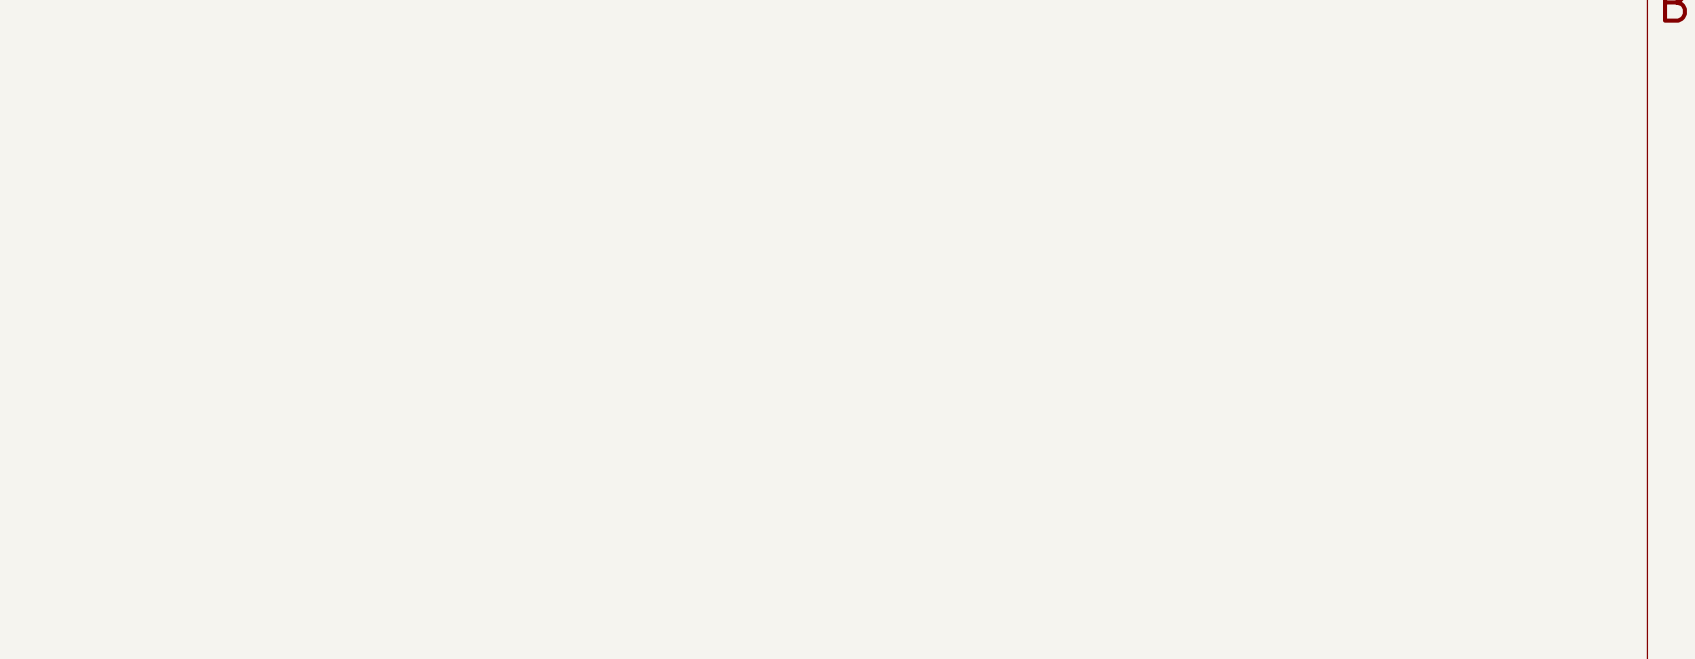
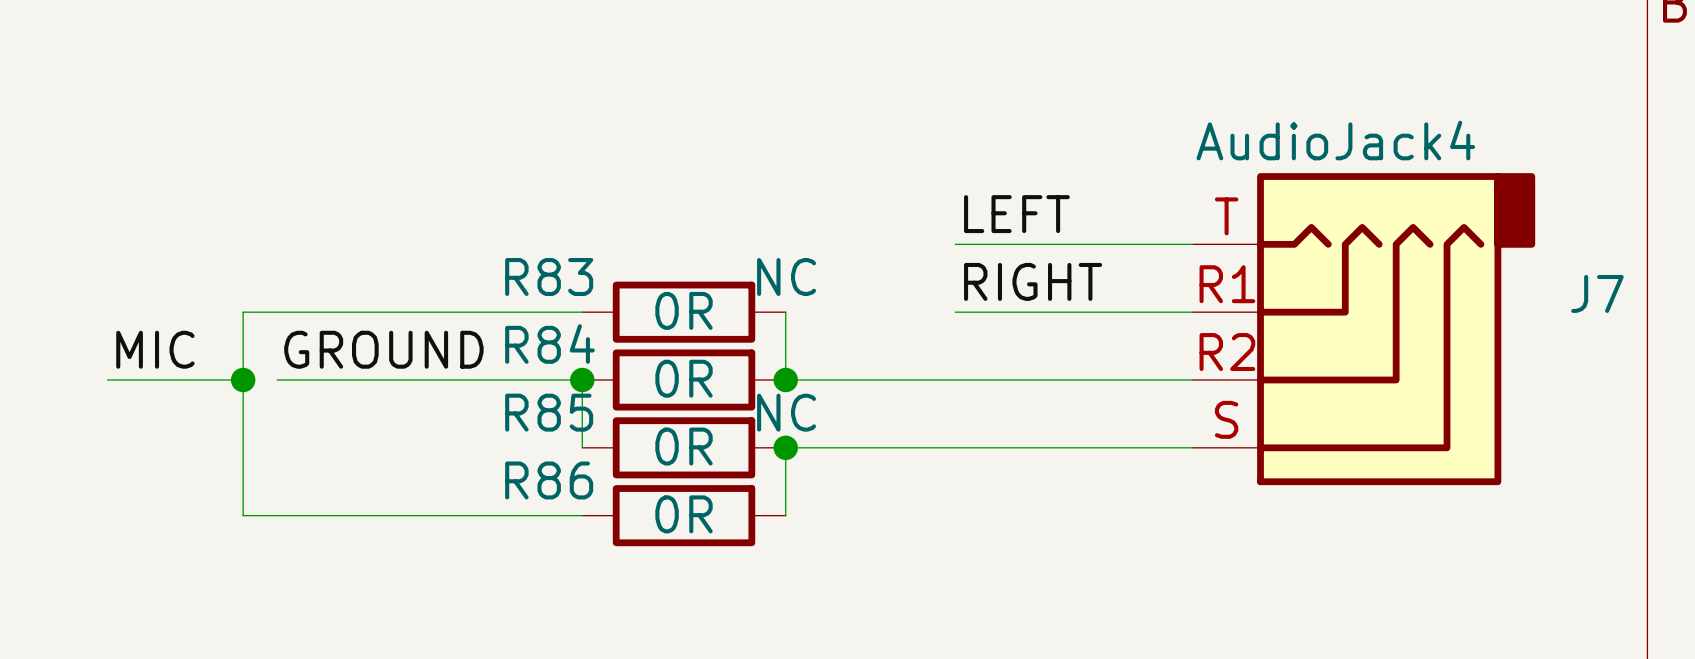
label: none -> LEFT (1016, 214)
wire: none -> (955, 244) (1192, 244)
label: none -> RIGHT (1033, 281)
wire: none -> (582, 312) (243, 312) (243, 515) (582, 515)
R83: none -> 0R (684, 312)
wire: none -> (785, 312) (785, 380) (1192, 380)
wire: none -> (955, 312) (1192, 312)
J7: none -> AudioJack4 (1363, 329)
label: none -> MIC (155, 349)
label: none -> GROUND (383, 349)
wire: none -> (107, 380) (243, 380)
junction: none -> (243, 380)
wire: none -> (277, 380) (582, 380) (582, 447)
junction: none -> (582, 380)
R84: none -> 0R (684, 380)
junction: none -> (785, 380)
R85: none -> 0R (684, 447)
junction: none -> (785, 447)
wire: none -> (1192, 447) (785, 447) (785, 515)
R86: none -> 0R (684, 515)

